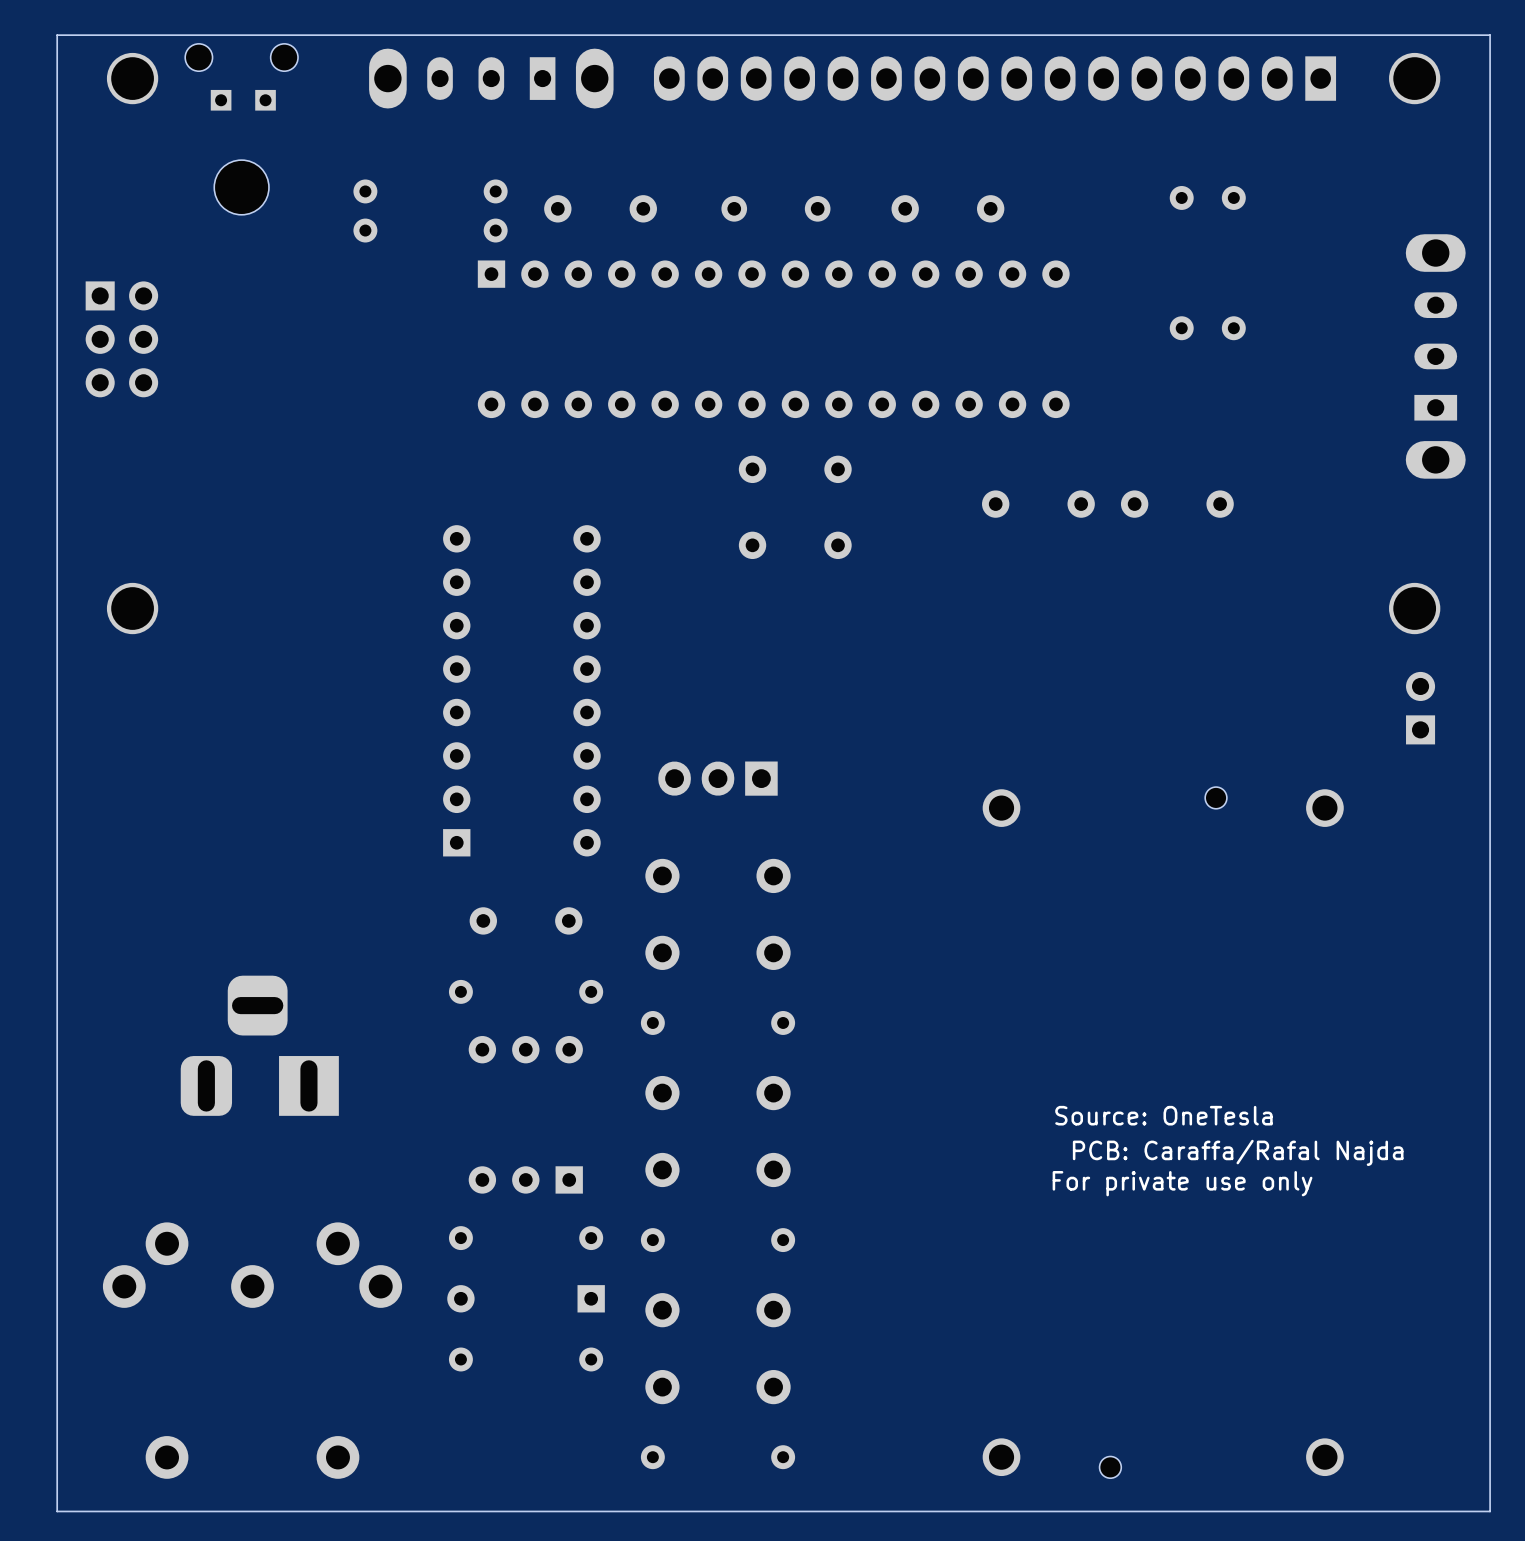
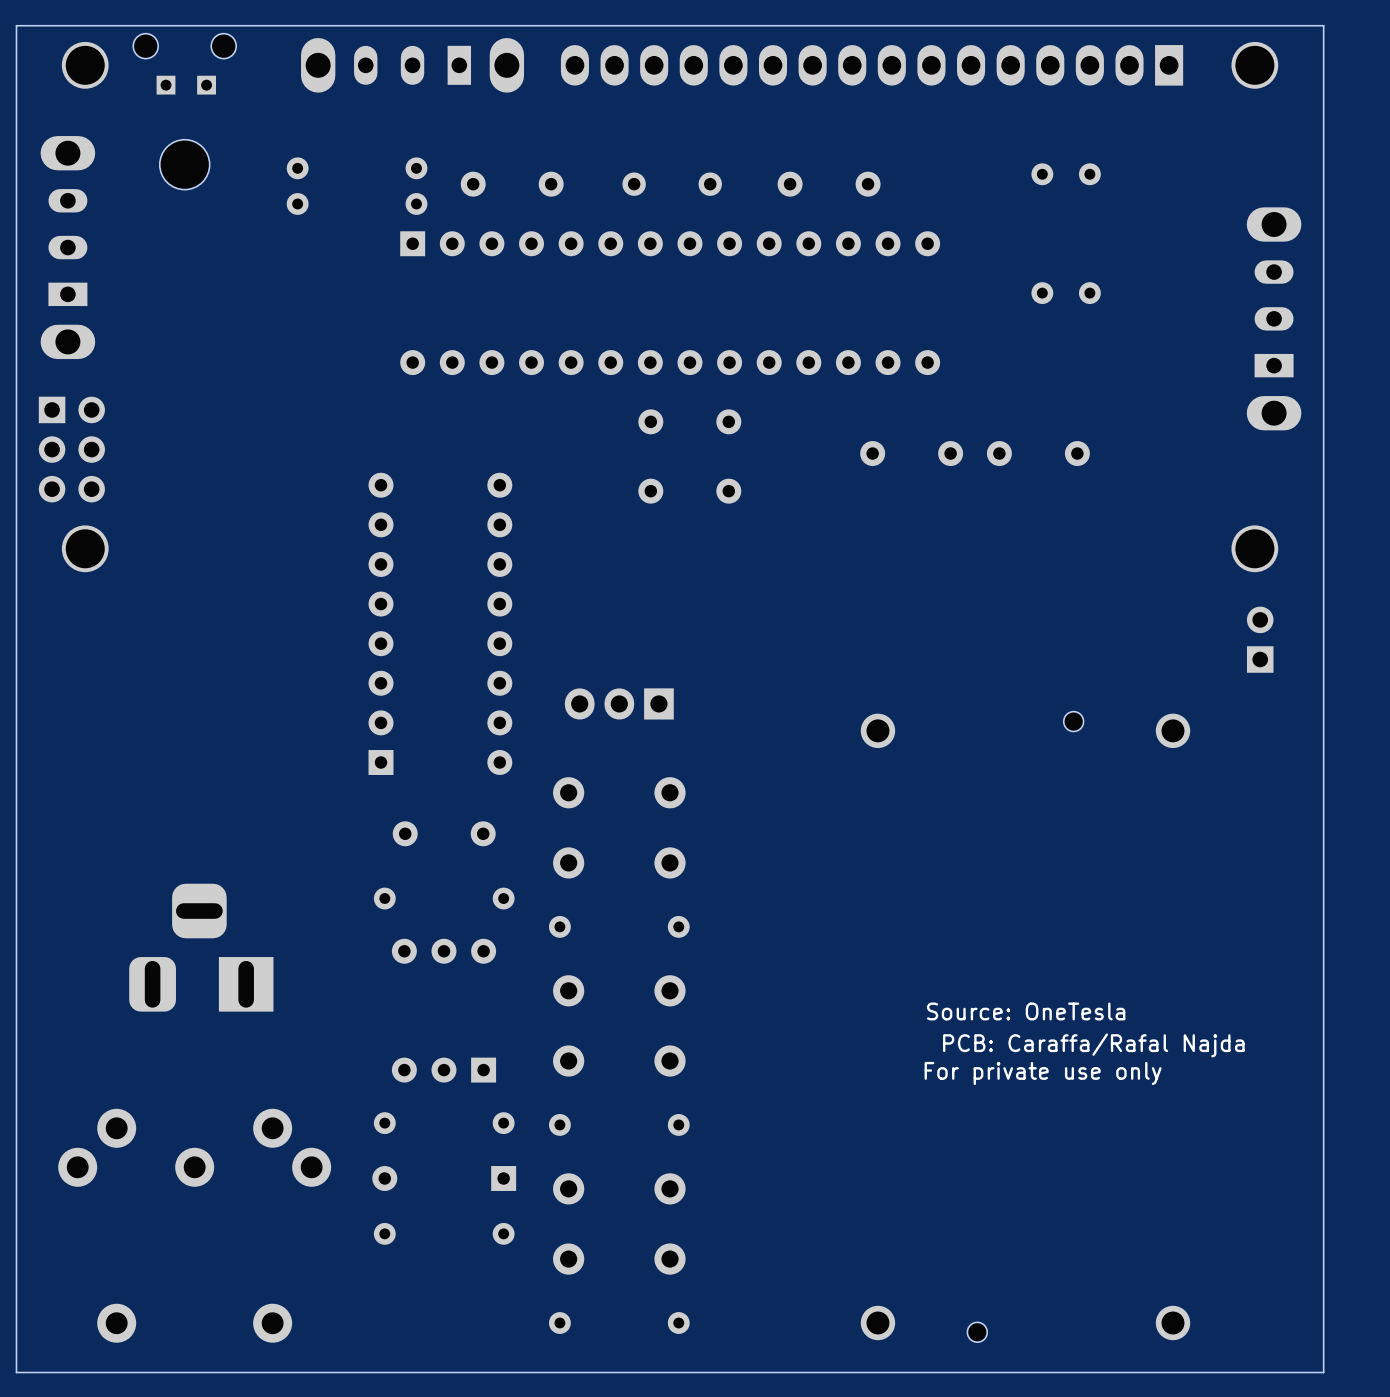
part: none -> (67, 247)
part position: (121, 339) -> (71, 449)

